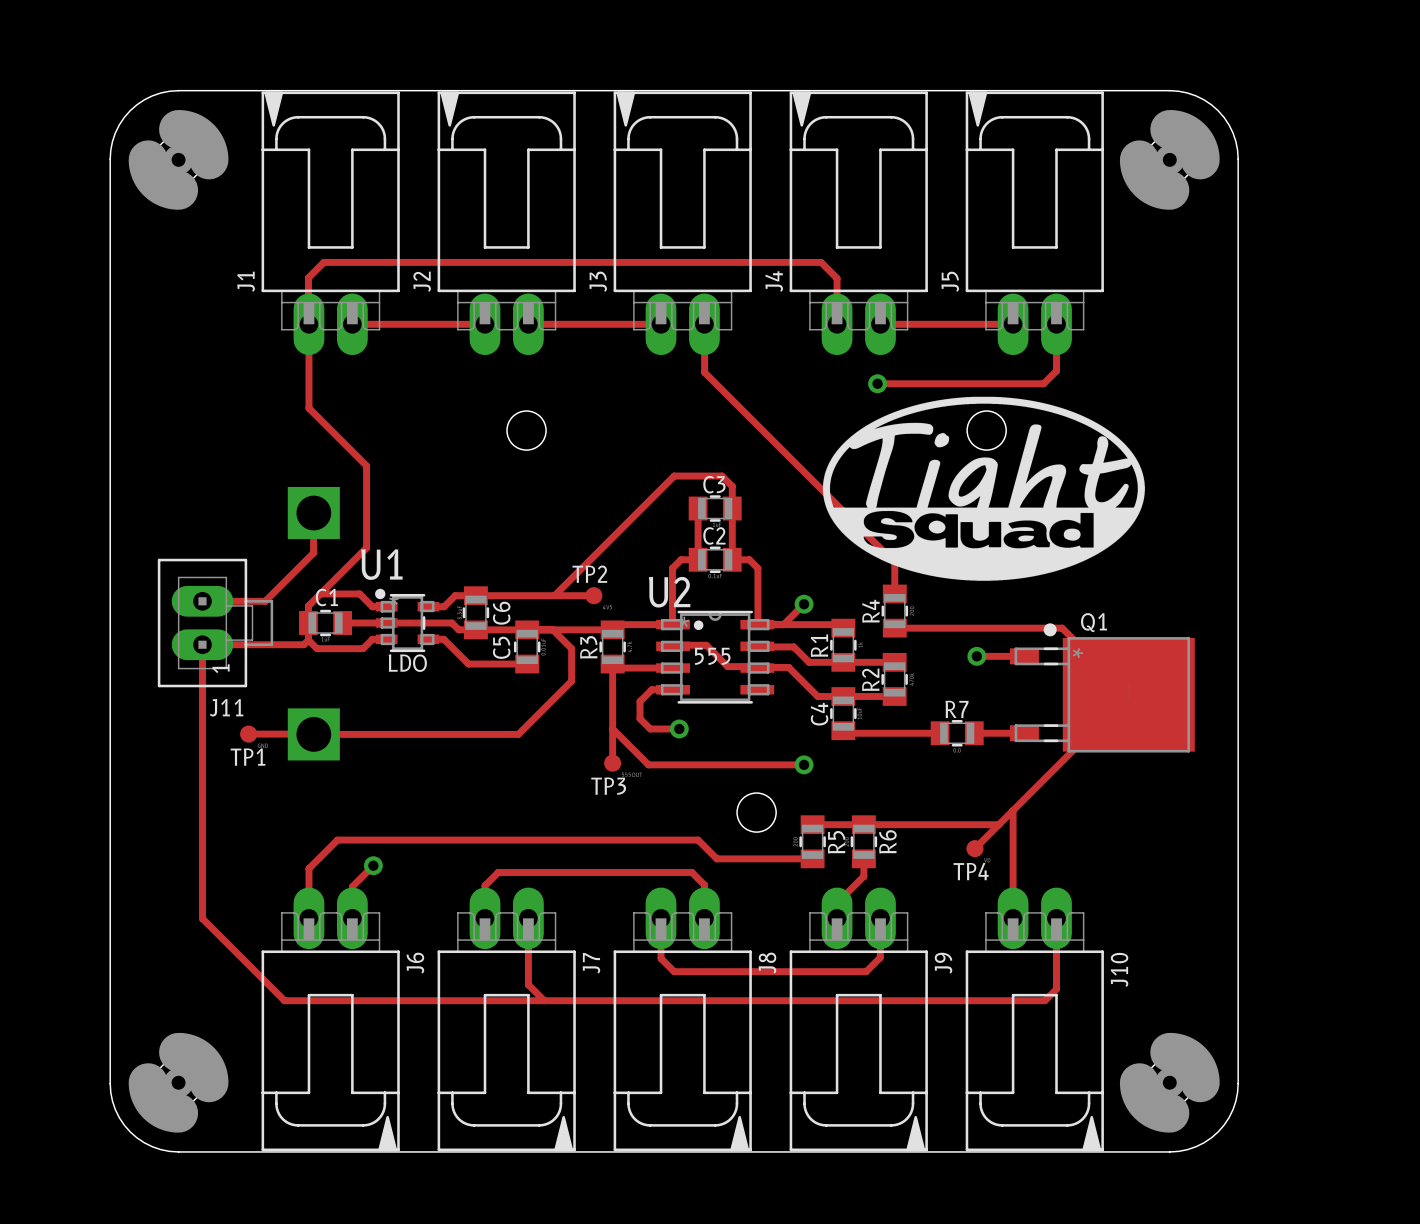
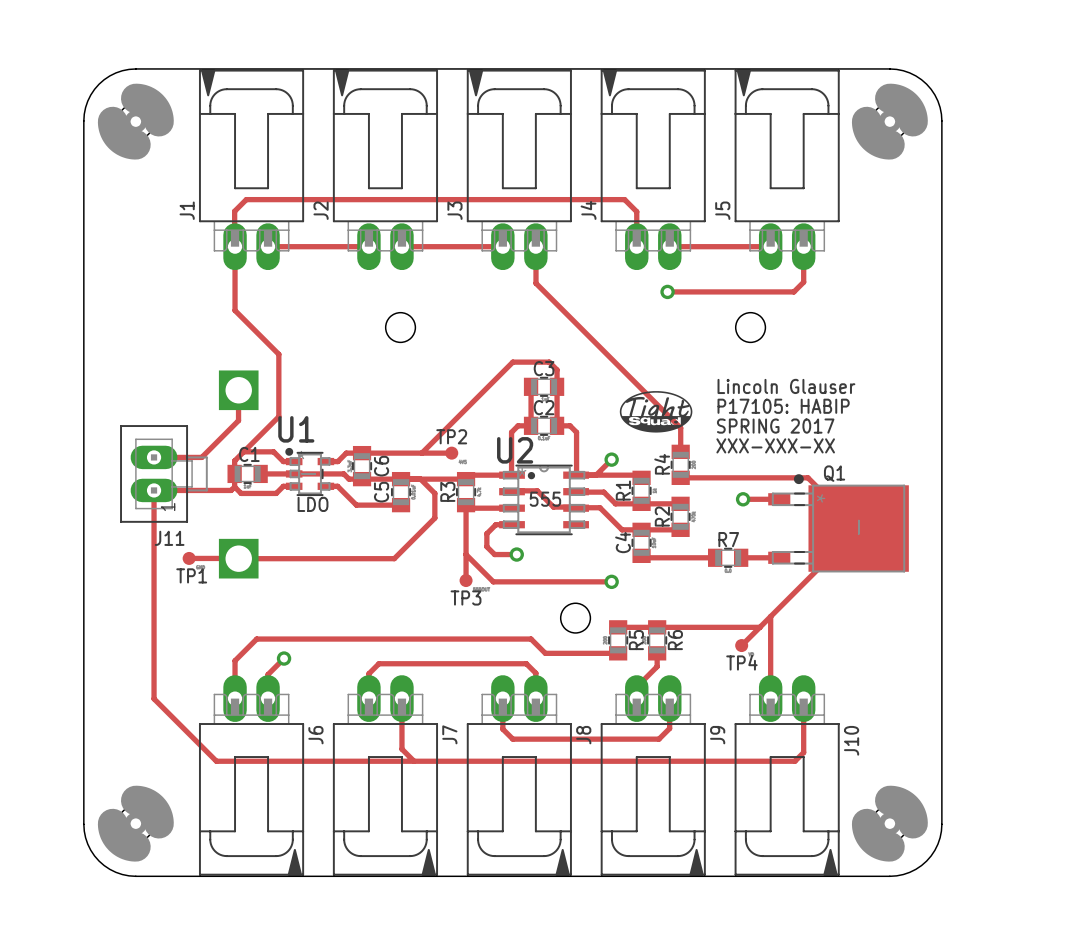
drawing: [822, 396, 1146, 581] -> none
text: none -> Lincoln Glauser (786, 386)
drawing: none -> [619, 391, 693, 433]
text: none -> P17105: HABIP (783, 406)
text: none -> SPRING 2017 (775, 426)
text: none -> XXX-XXX-XX (775, 445)

